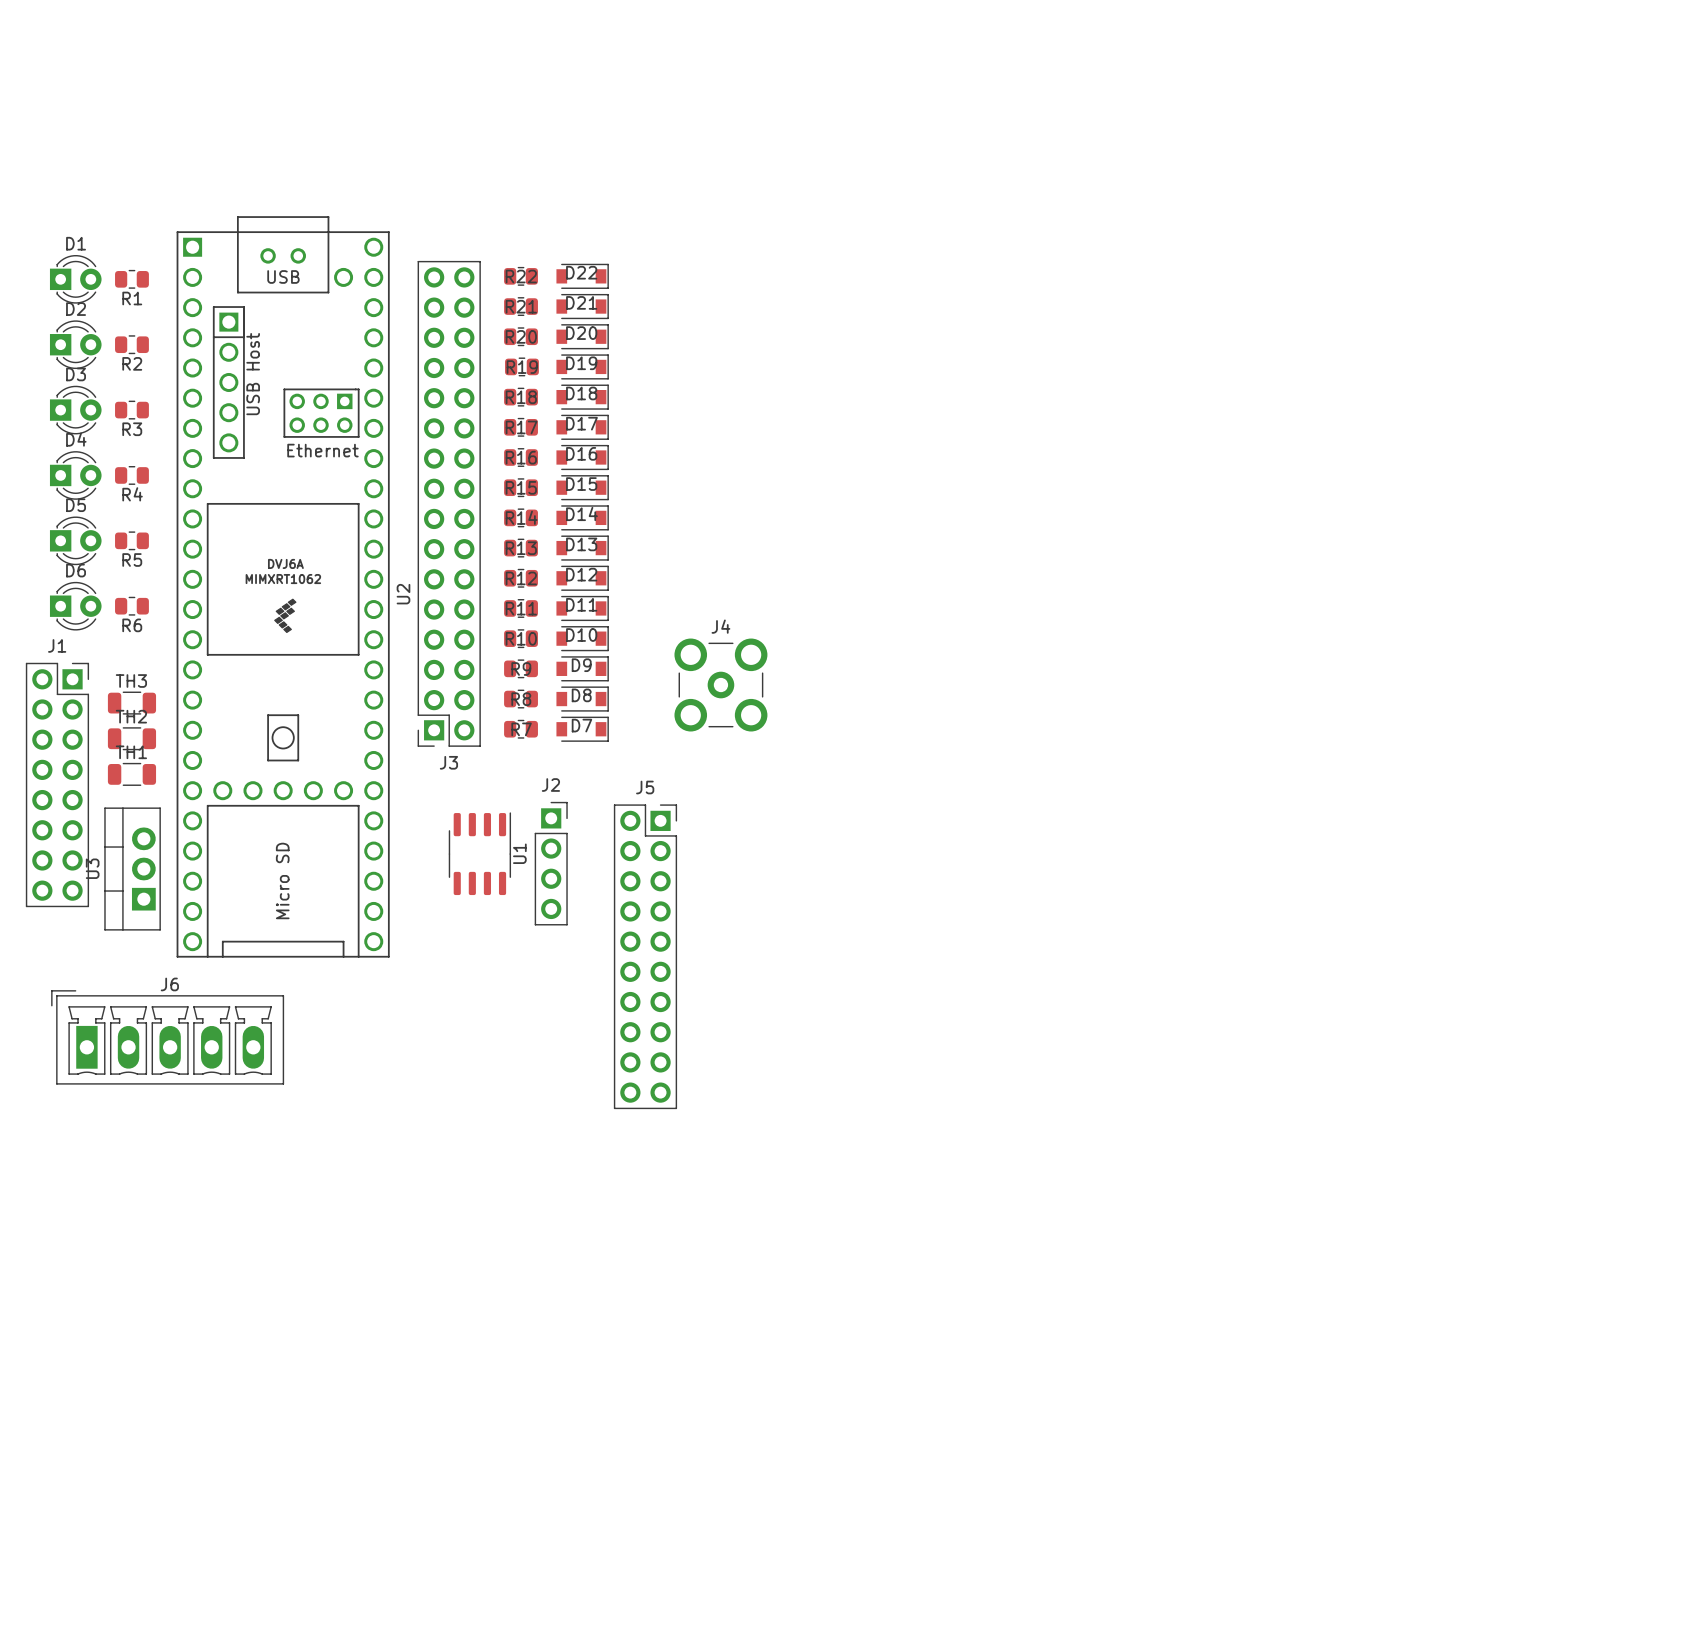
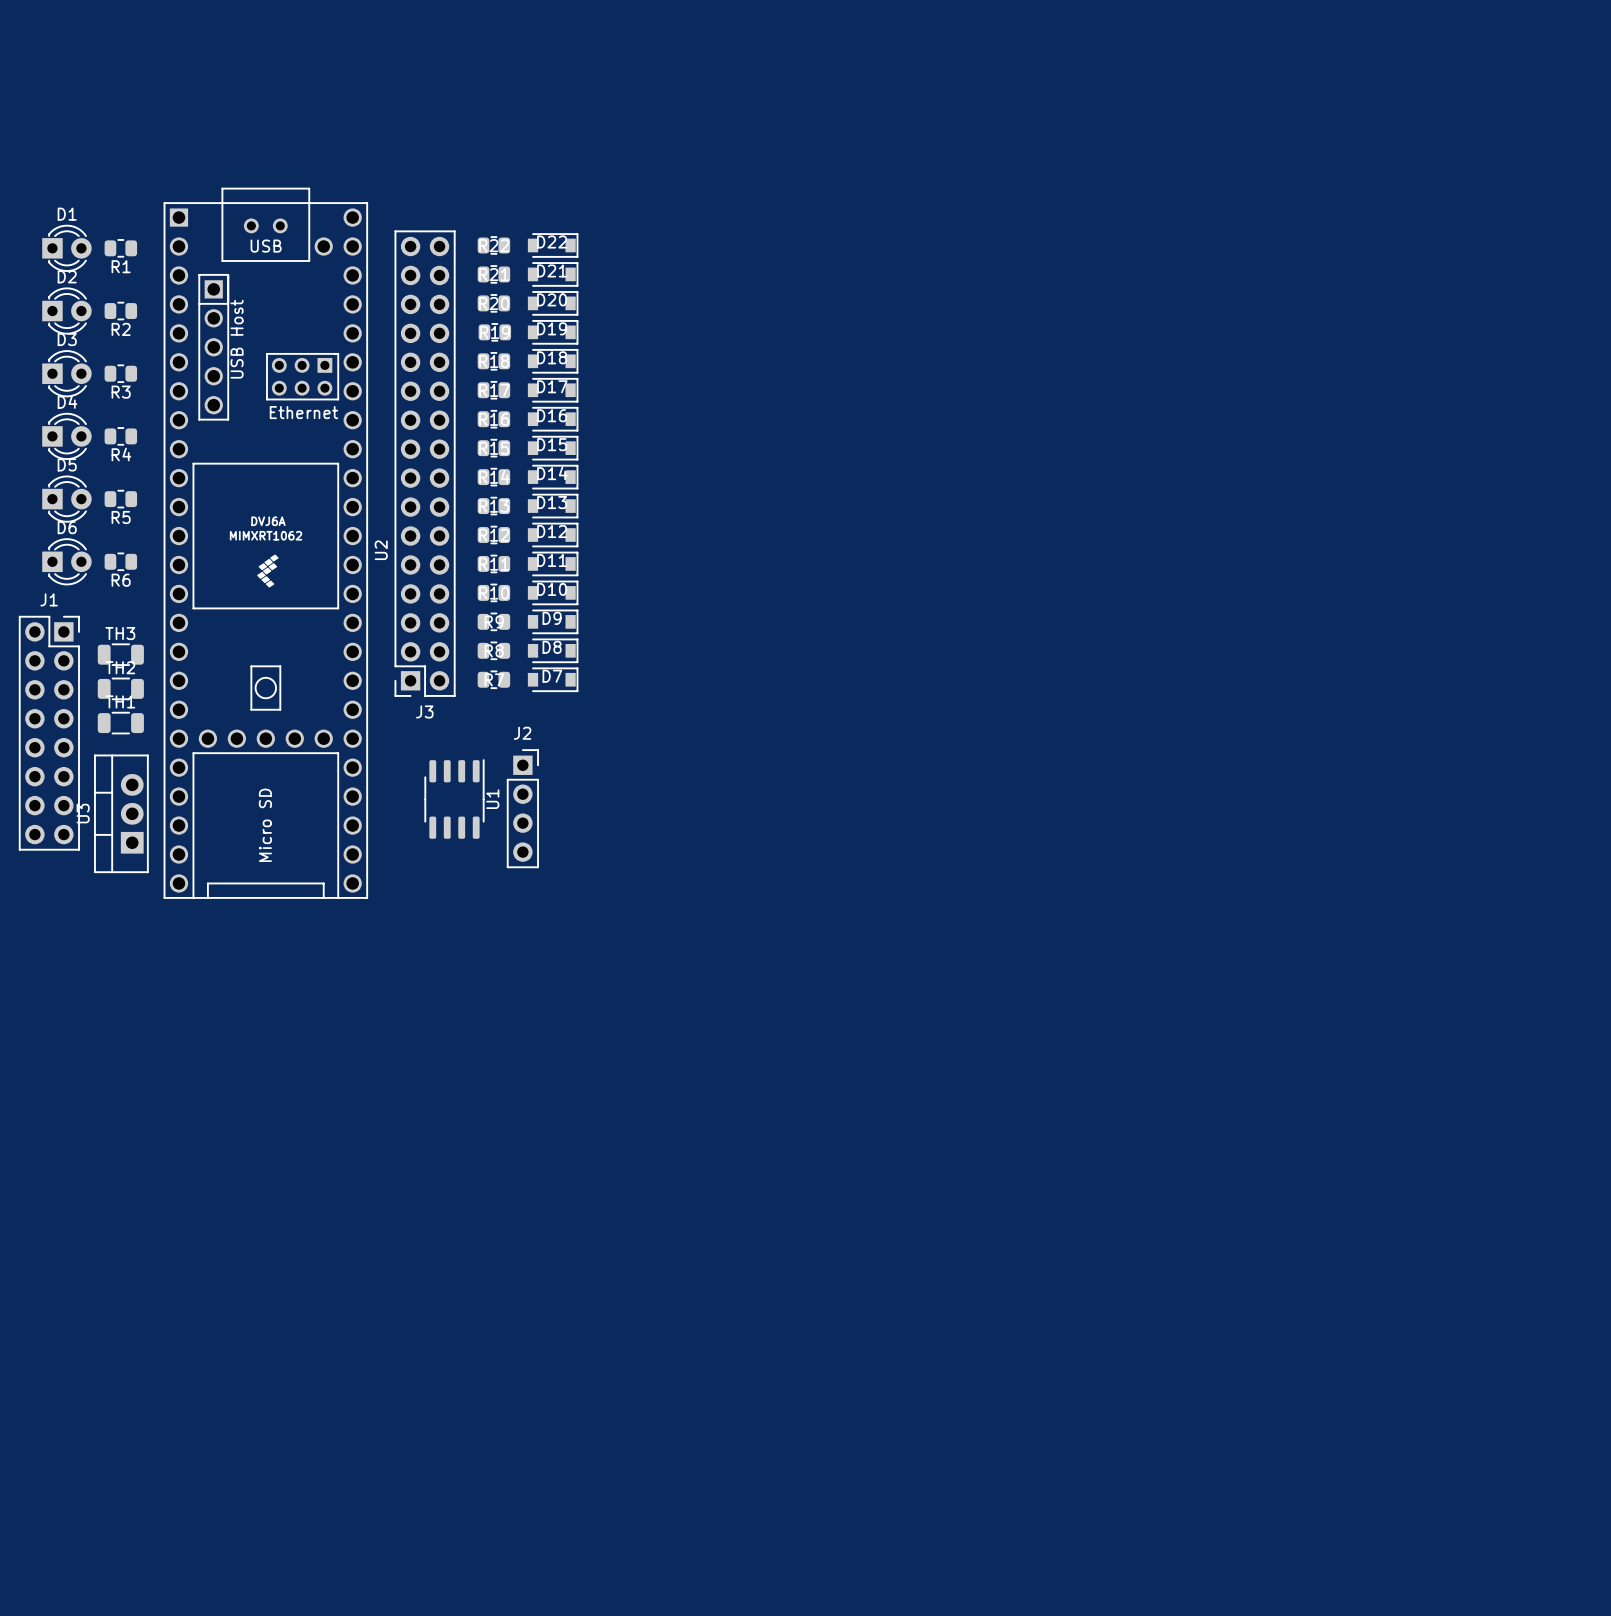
J4: (720, 685) -> none
J5: (645, 956) -> none
J6: (167, 1037) -> none

